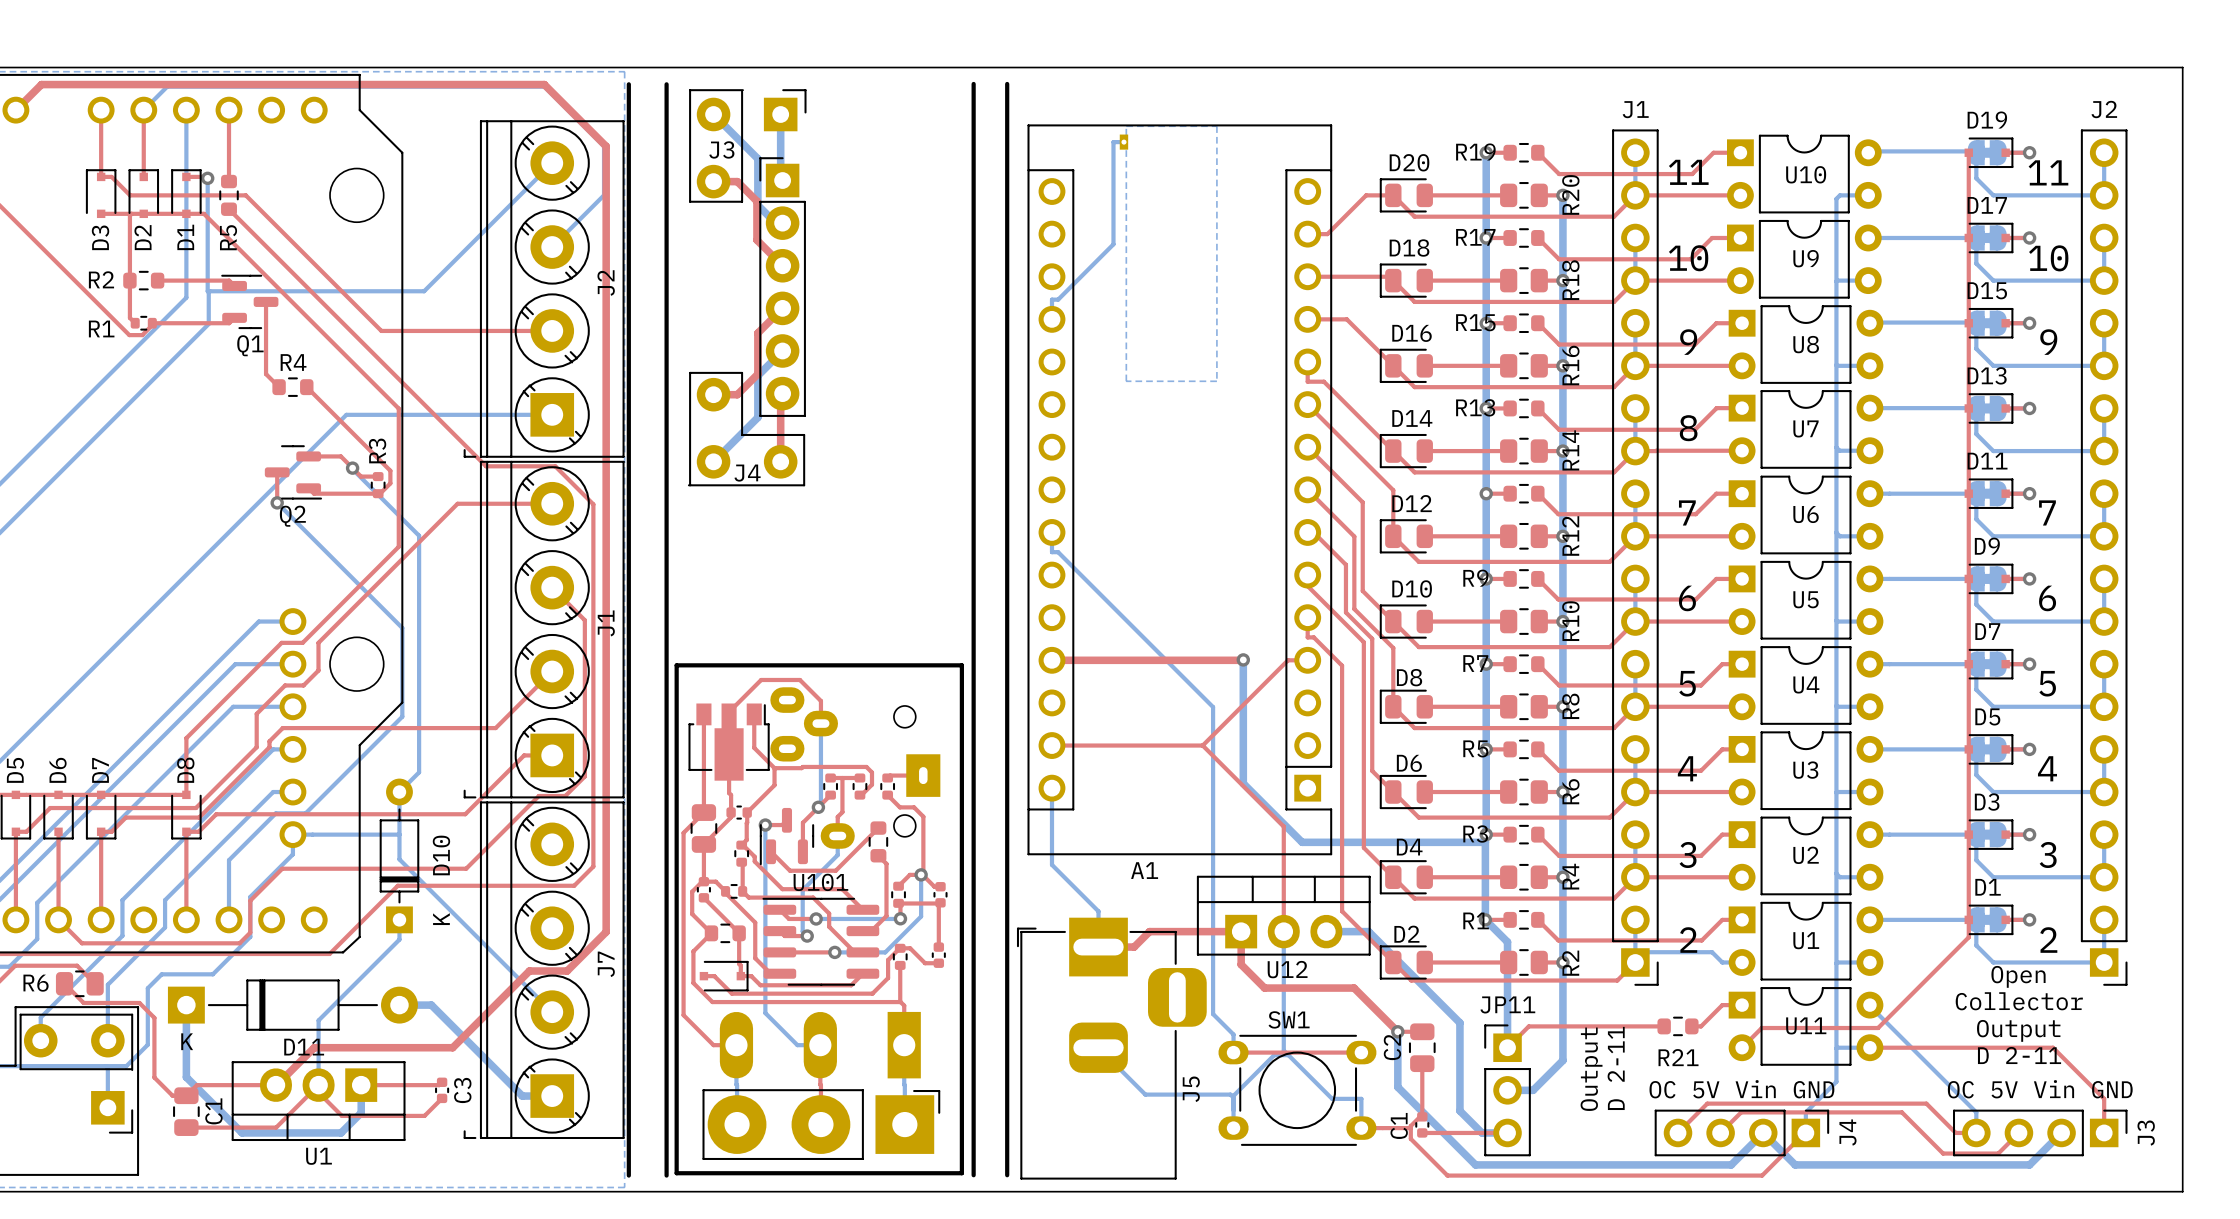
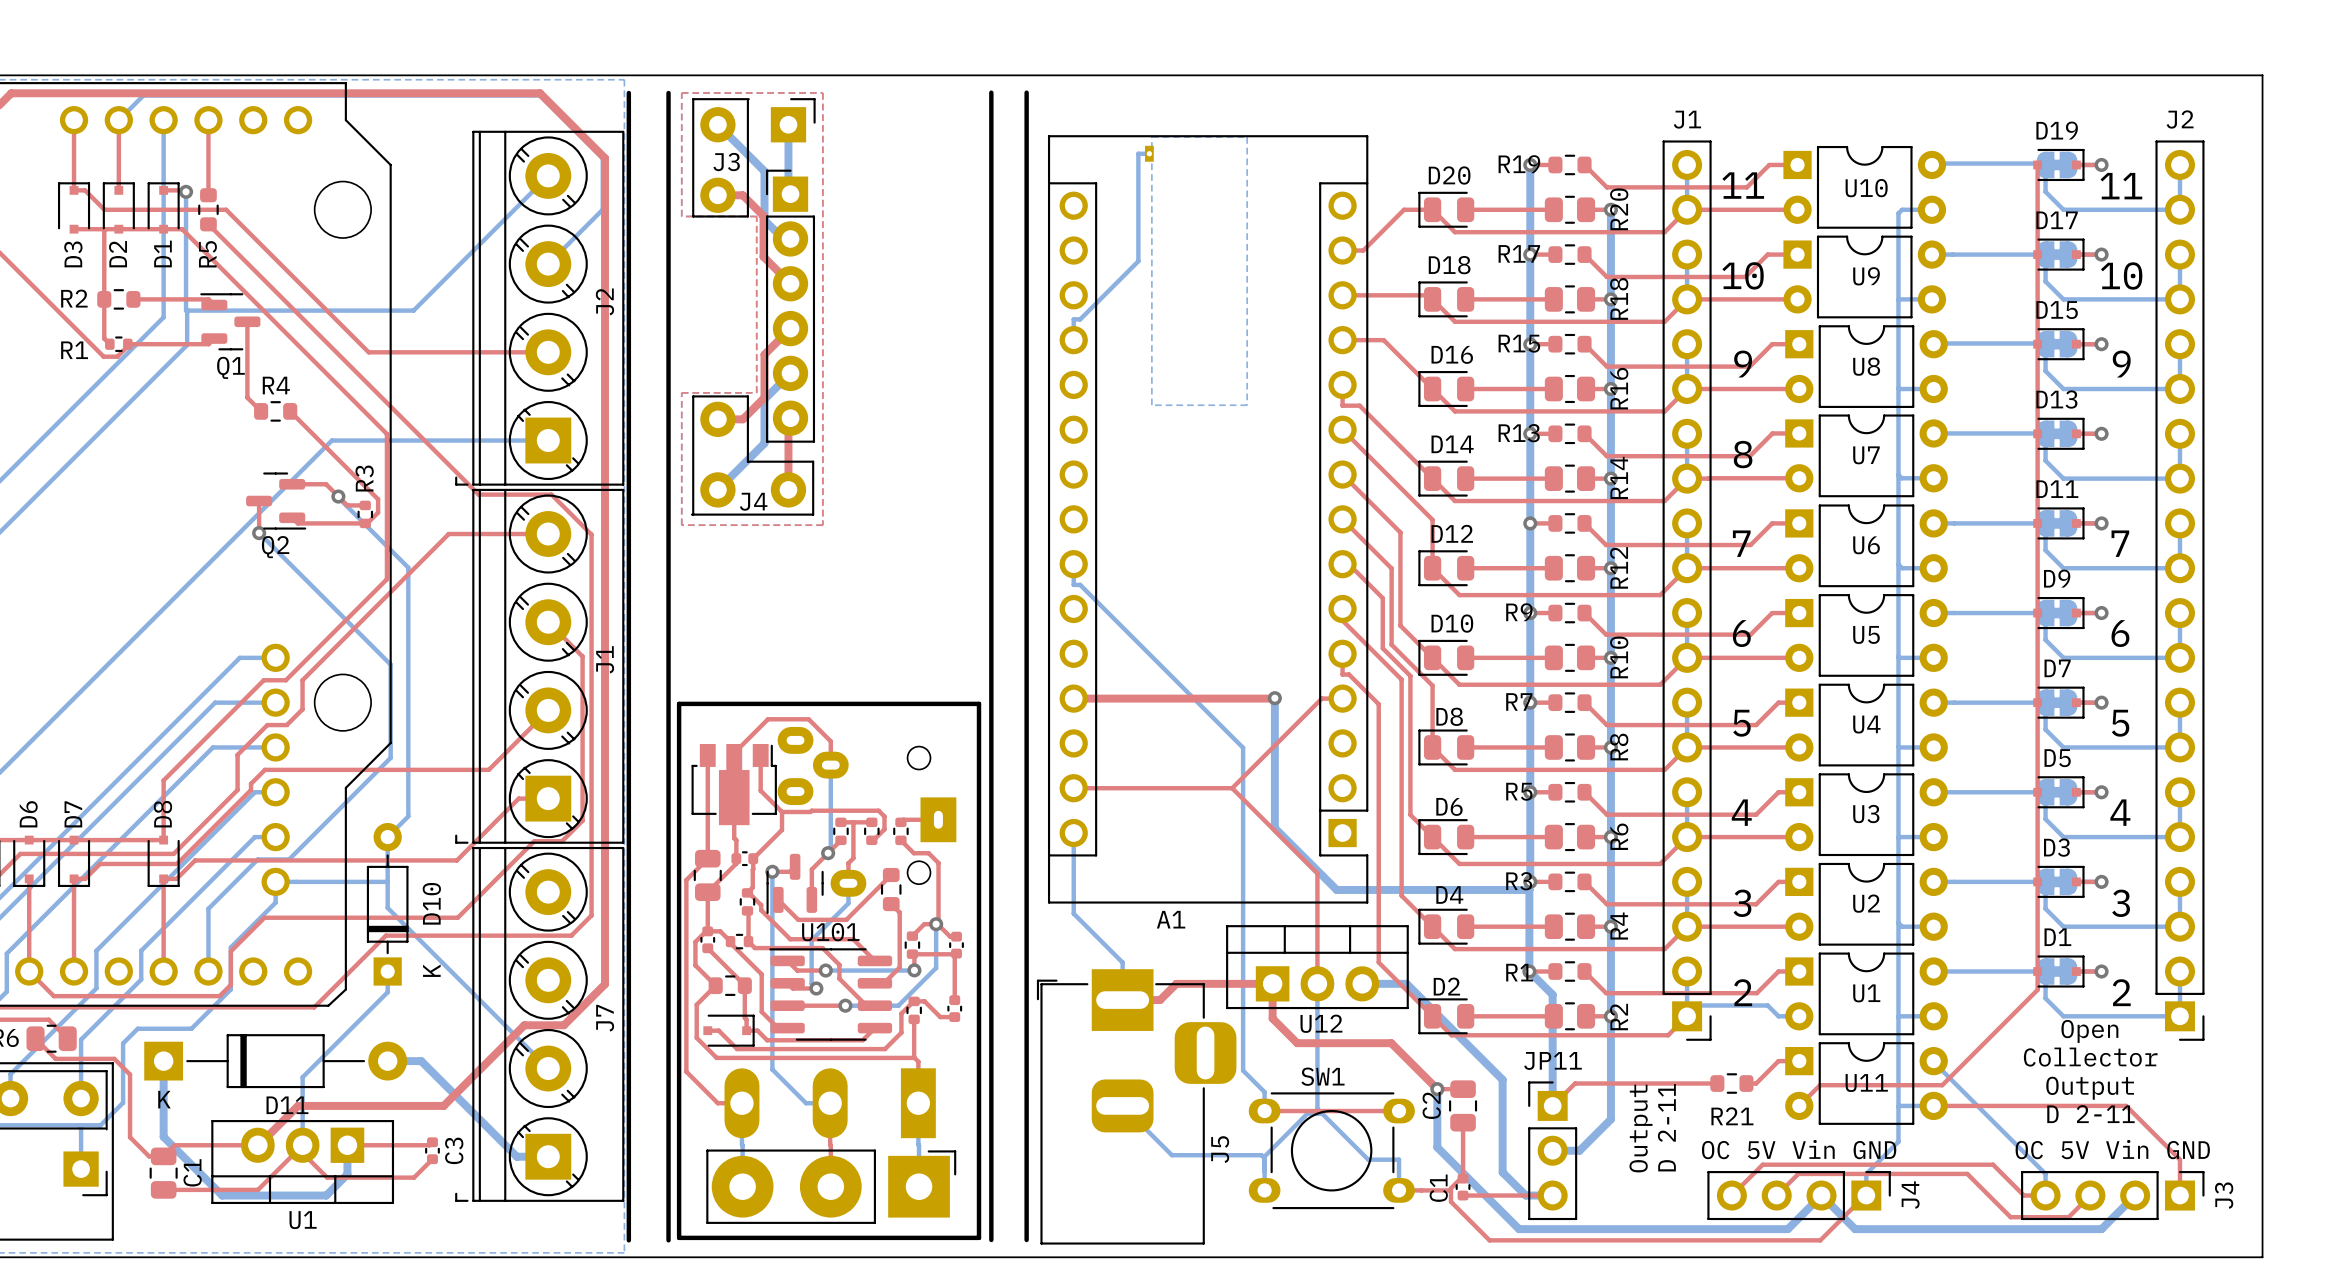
top zone outline: none -> (681, 92) (681, 216) (756, 216) (756, 392) (681, 392) (681, 525) (822, 525) (822, 92) (681, 92)

